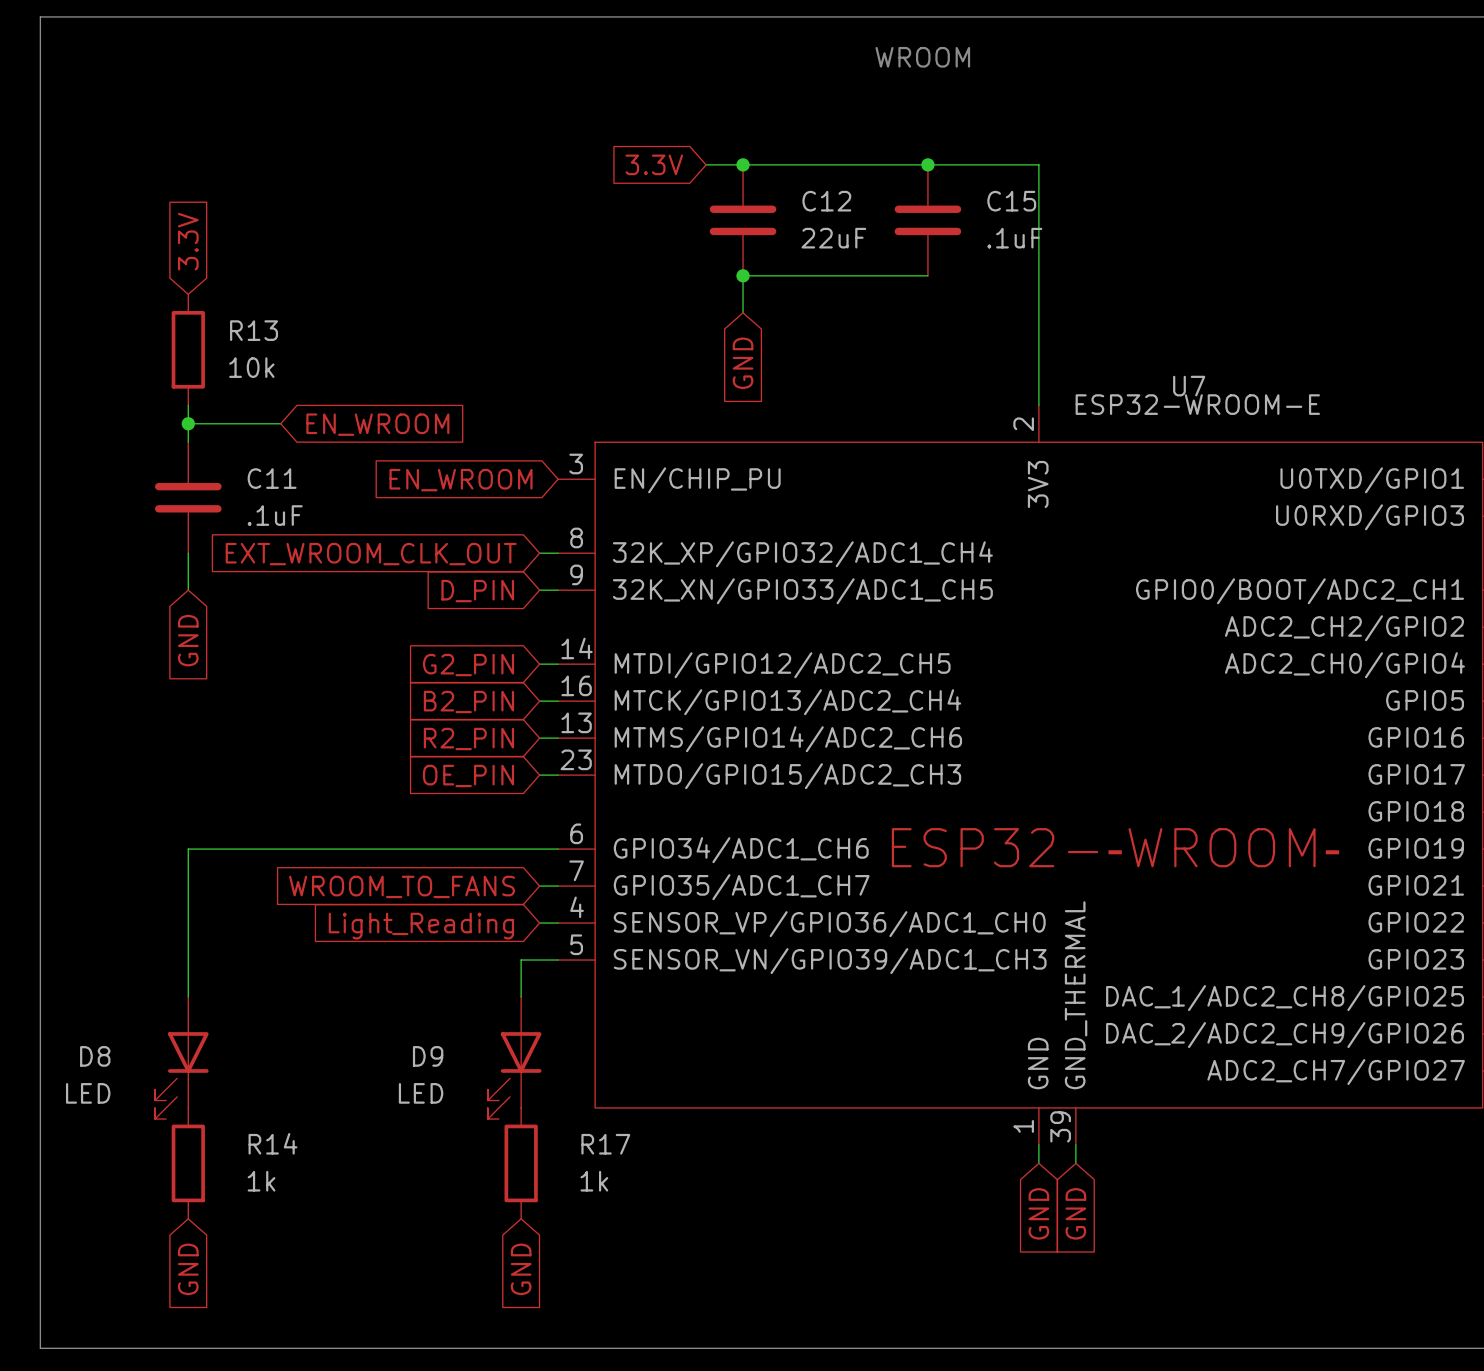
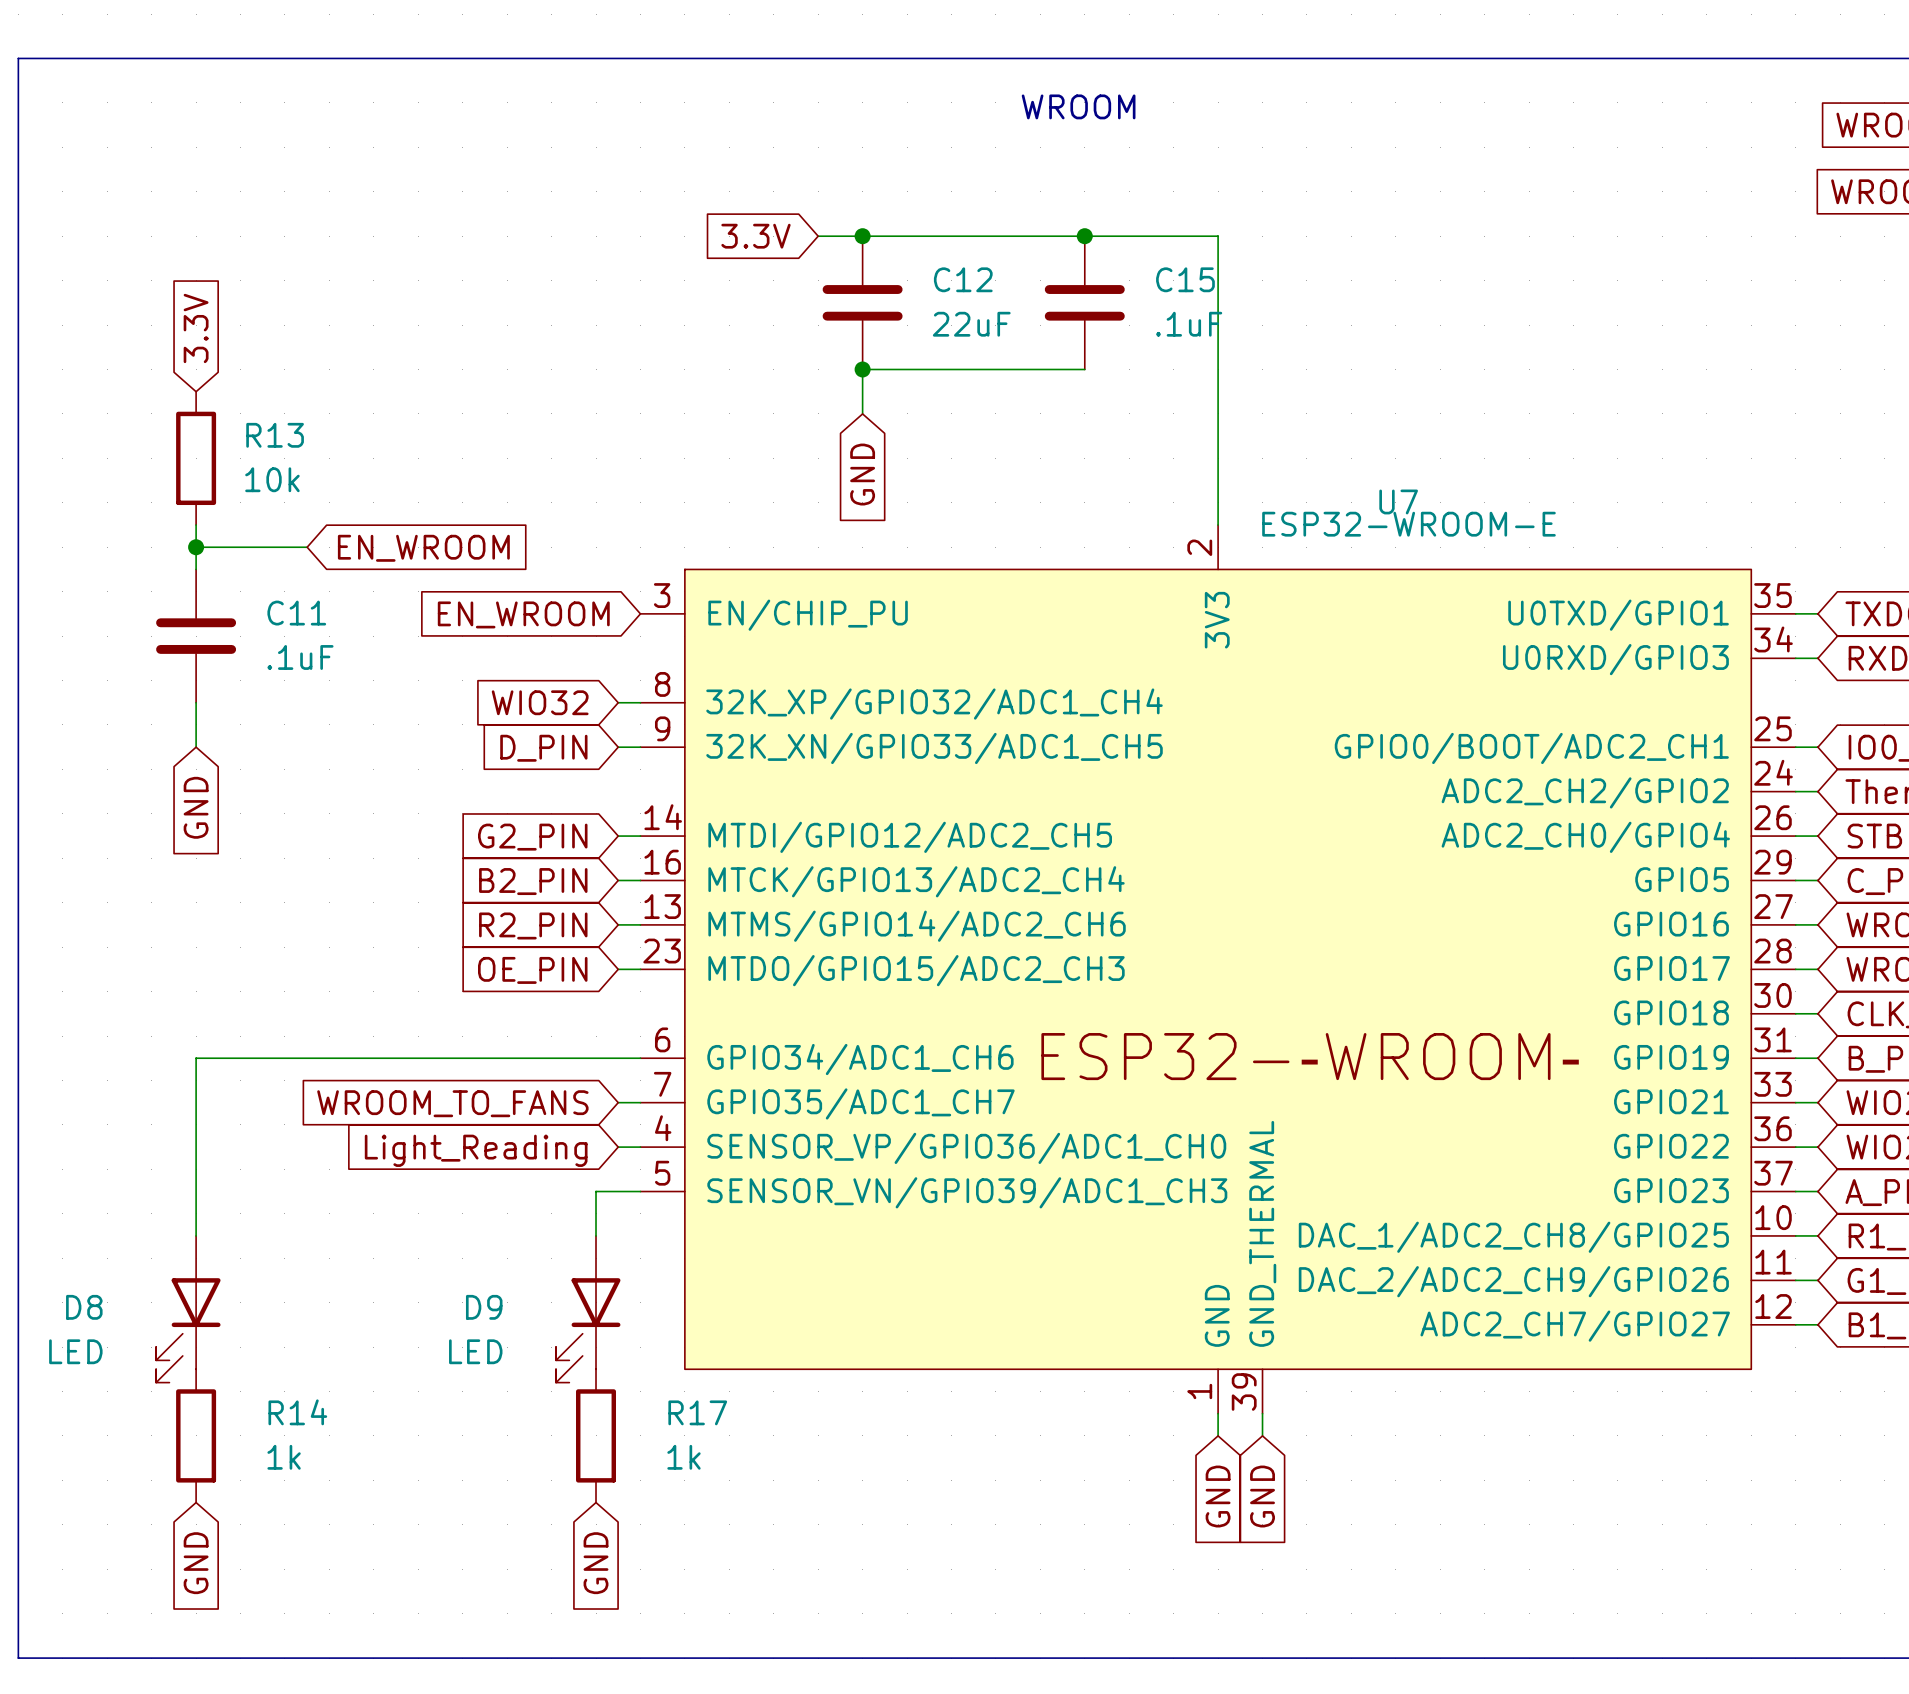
global label: EXT_WROOM_CLK_OUT (371, 554) -> WIO32 (540, 702)

